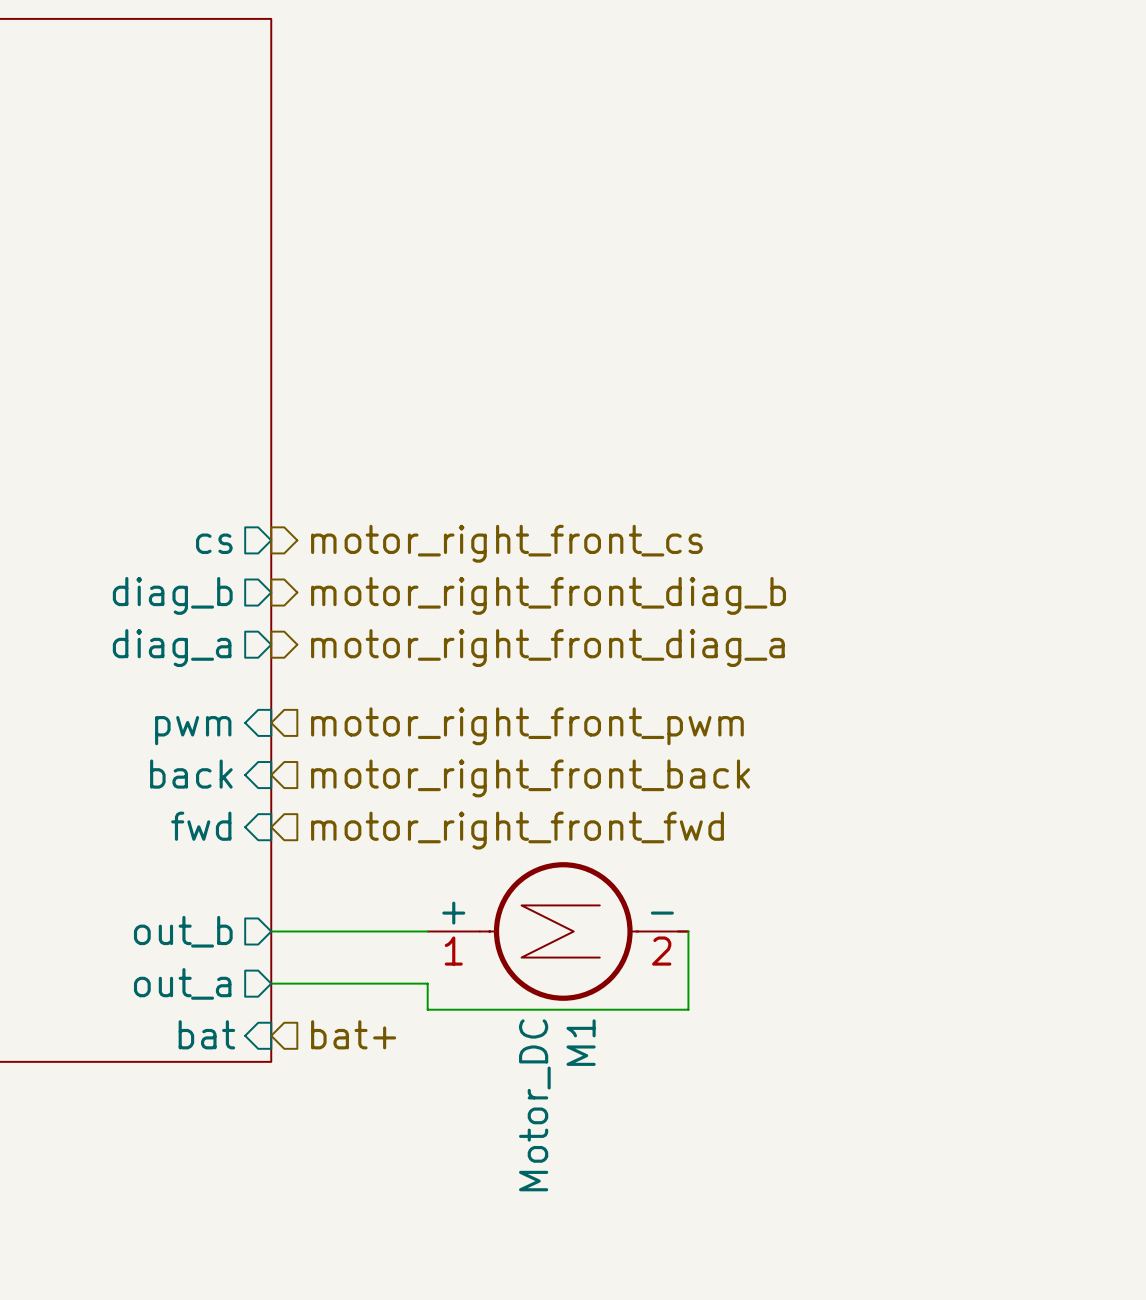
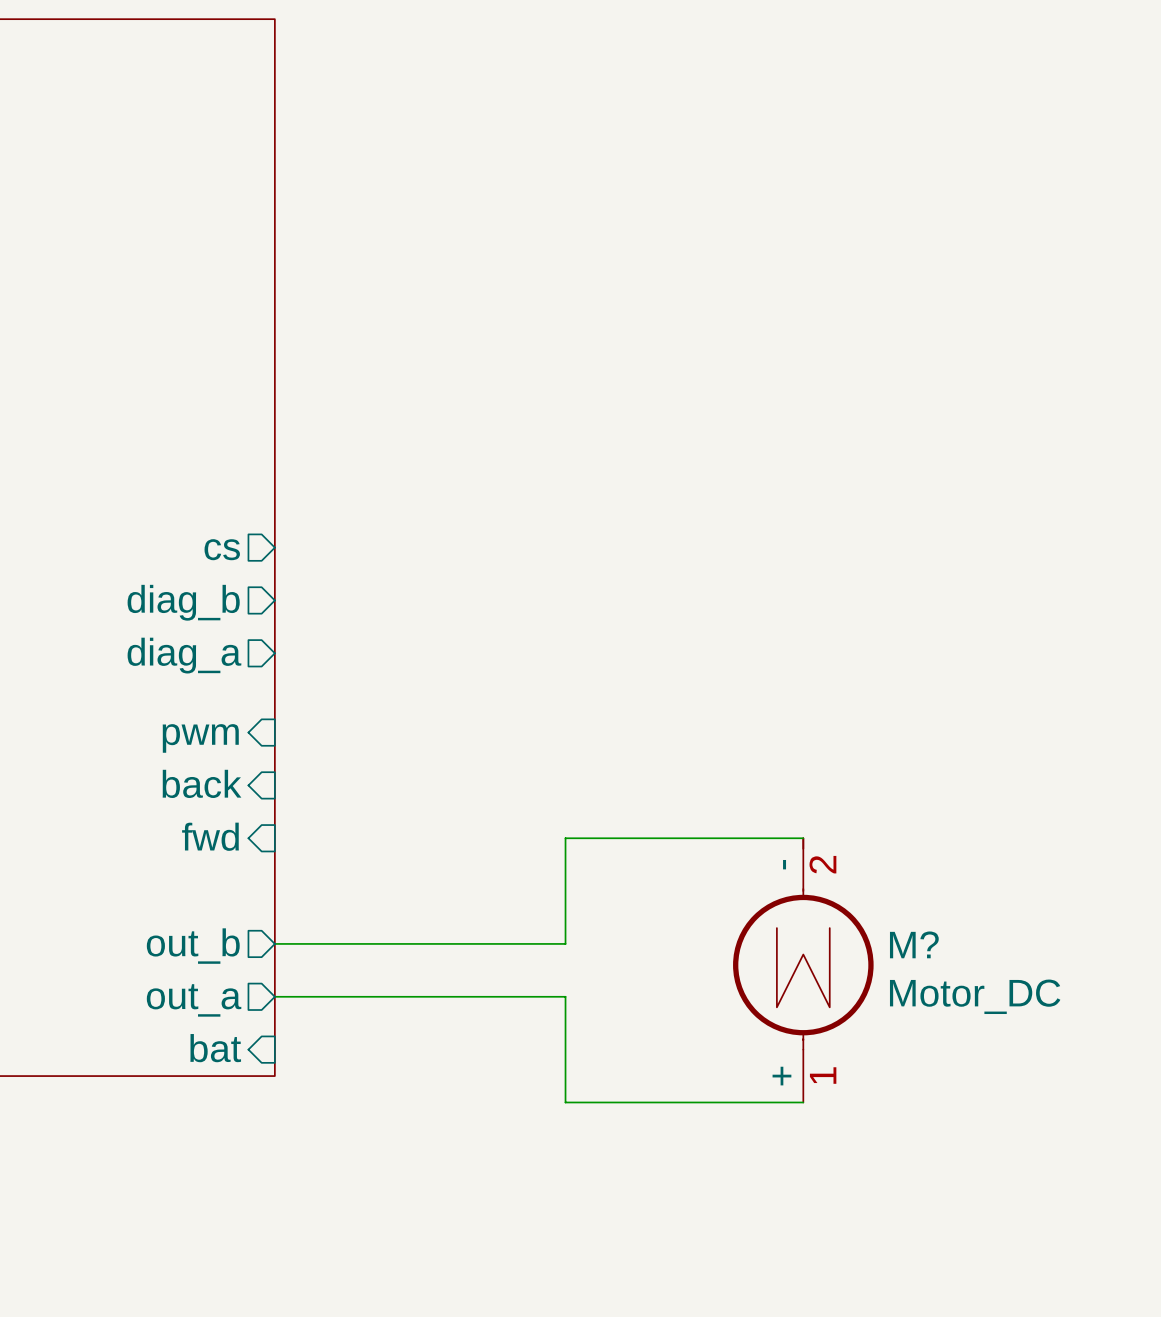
hierarchical label: motor_right_front_cs (506, 543) -> none
hierarchical label: motor_right_front_diag_b (548, 595) -> none
hierarchical label: motor_right_front_diag_a (547, 648) -> none
hierarchical label: motor_right_front_pwm (527, 726) -> none
hierarchical label: motor_right_front_back (530, 778) -> none
wire: none -> (803, 838) (565, 838) (565, 943) (433, 943)
hierarchical label: motor_right_front_fwd (517, 830) -> none
M1: Motor_DC (558, 931) -> none
wire: (688, 931) (688, 1009) (427, 1009) (427, 983) -> (803, 1102) (565, 1102) (565, 996) (433, 996)
M?: none -> Motor_DC (803, 970)
hierarchical label: bat+ (353, 1034) -> none

